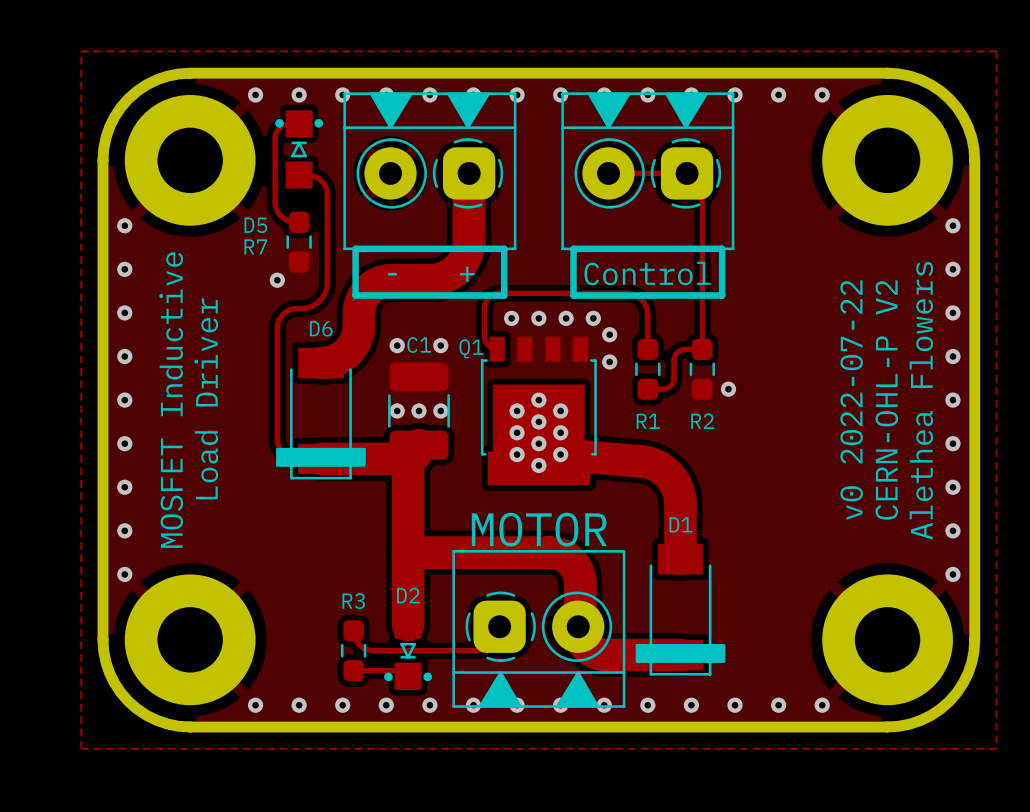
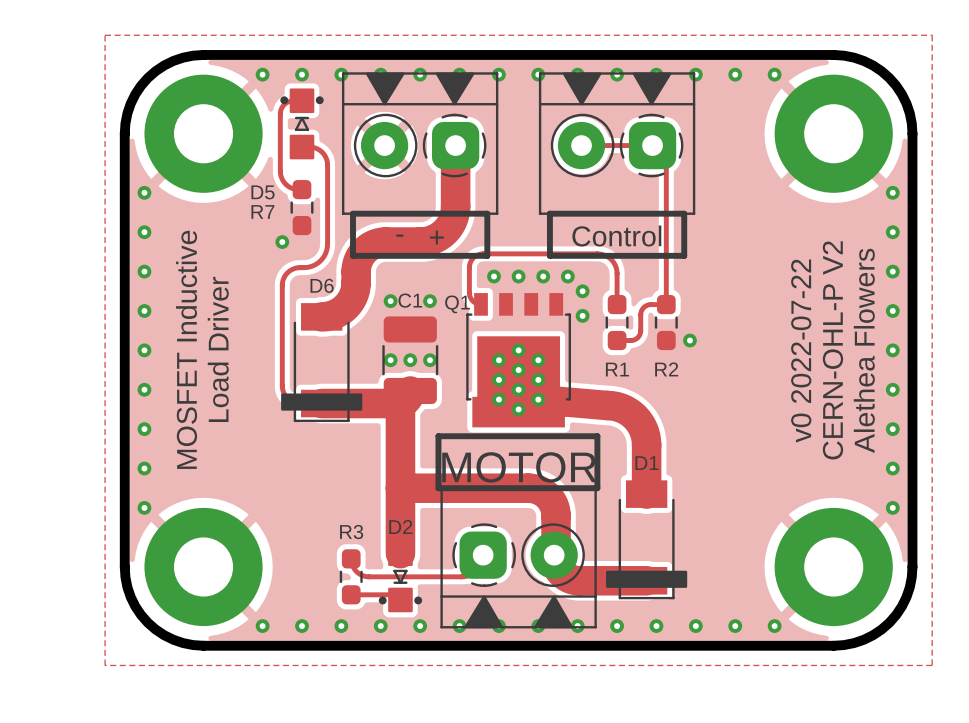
line: none -> (438, 436) (438, 488) (597, 488) (597, 436) (438, 436)

